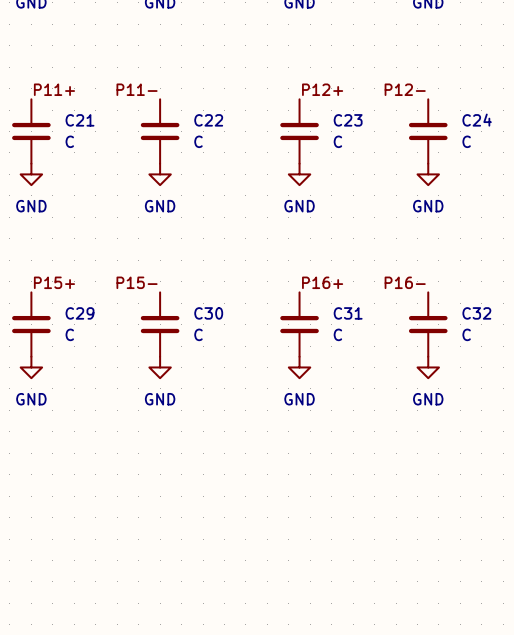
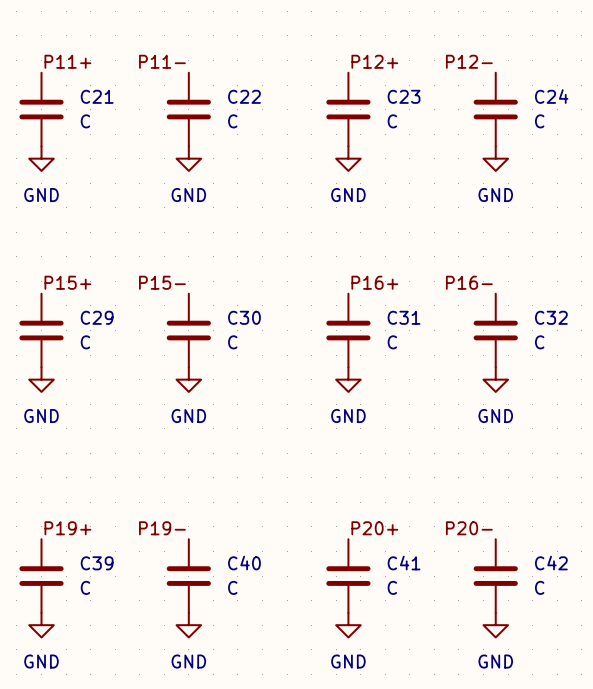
label: none -> P19+ (67, 528)
label: none -> P19- (162, 528)
label: none -> P20+ (374, 528)
label: none -> P20- (469, 528)
C39: none -> C (41, 576)
C40: none -> C (188, 576)
C41: none -> C (348, 576)
C42: none -> C (495, 576)
power symbol: none -> GND (41, 625)
power symbol: none -> GND (188, 625)
power symbol: none -> GND (348, 625)
power symbol: none -> GND (495, 625)

